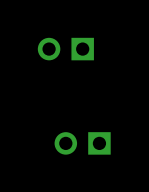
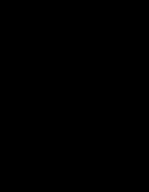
part: (65, 49) -> none
part: (82, 143) -> none

